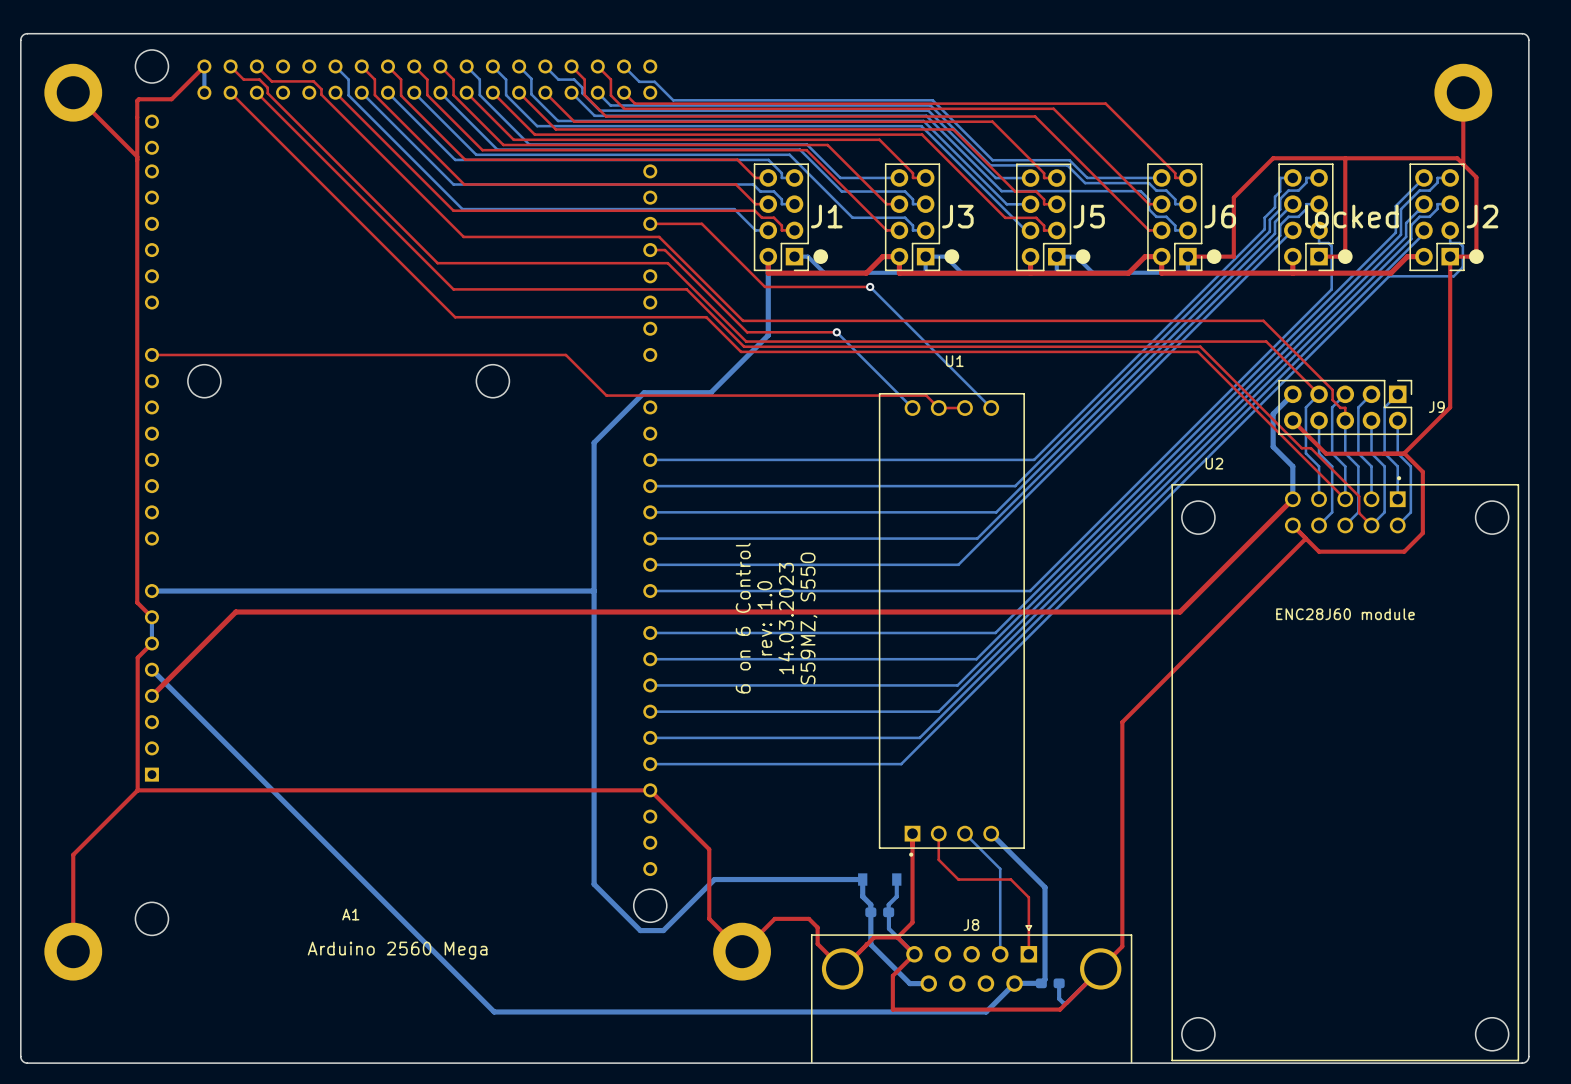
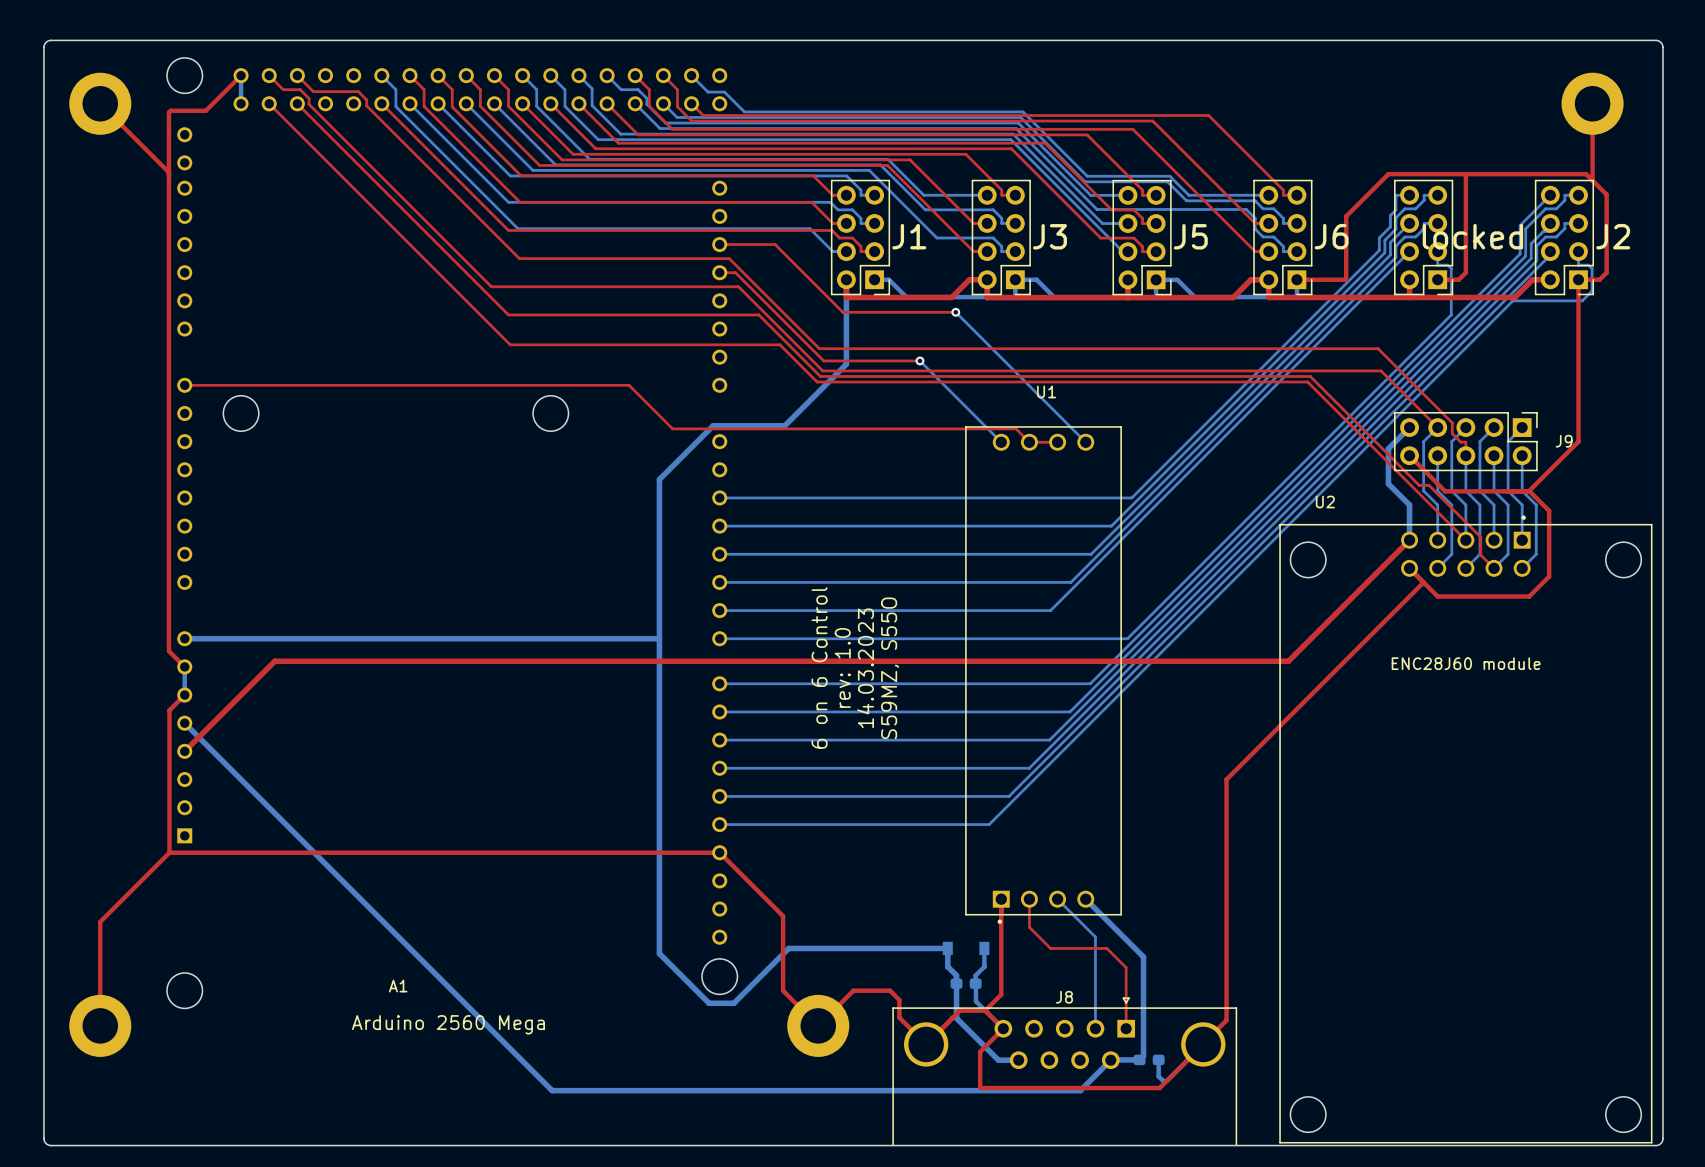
drawing: [813, 249, 829, 264] -> none
drawing: [944, 249, 960, 264] -> none
drawing: [1075, 249, 1091, 264] -> none
drawing: [1206, 249, 1222, 264] -> none
drawing: [1337, 249, 1353, 264] -> none
drawing: [1469, 249, 1484, 264] -> none

